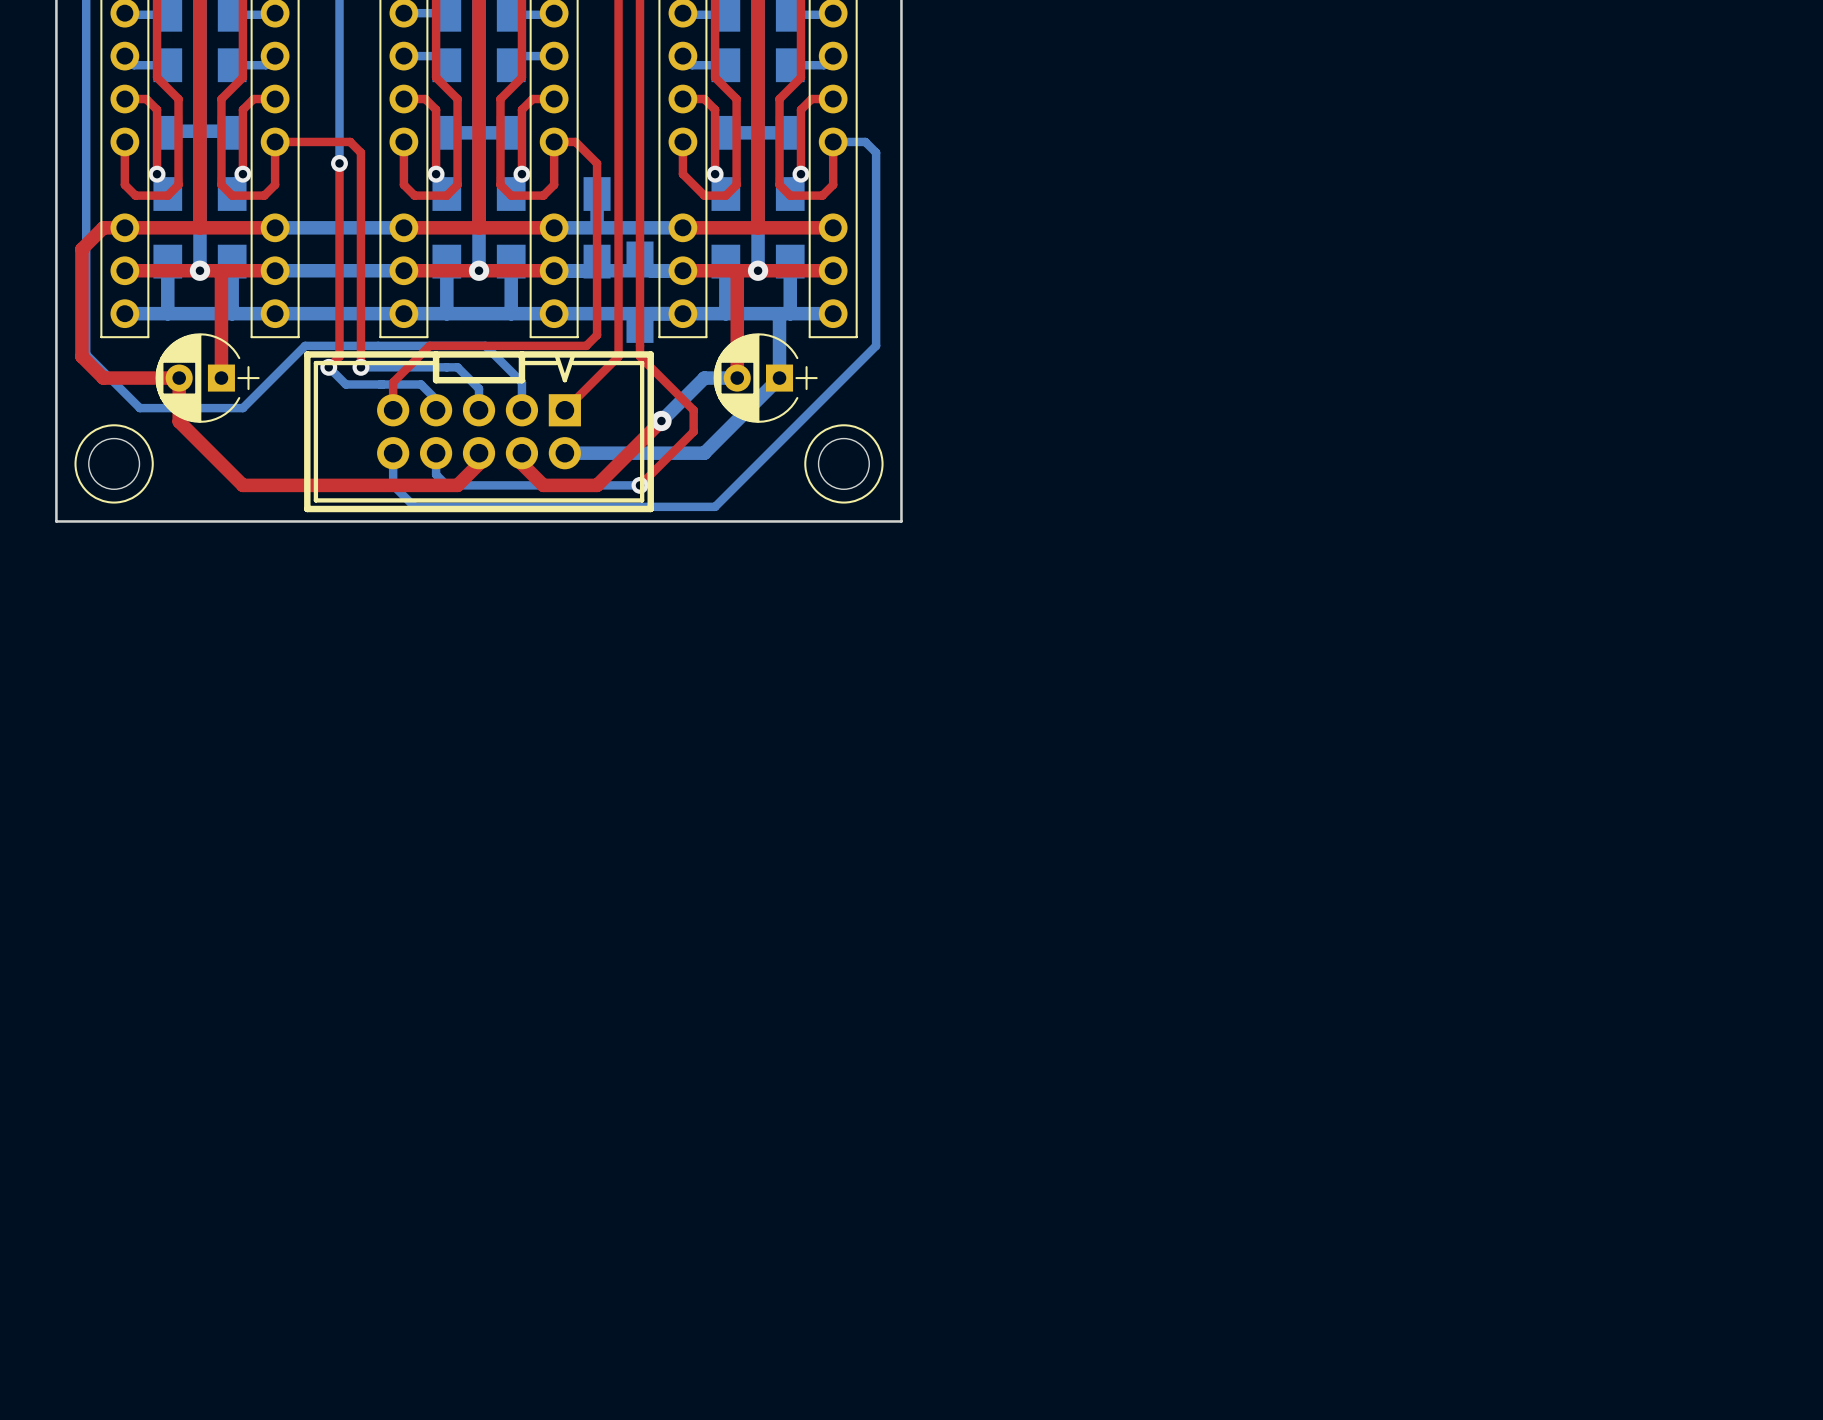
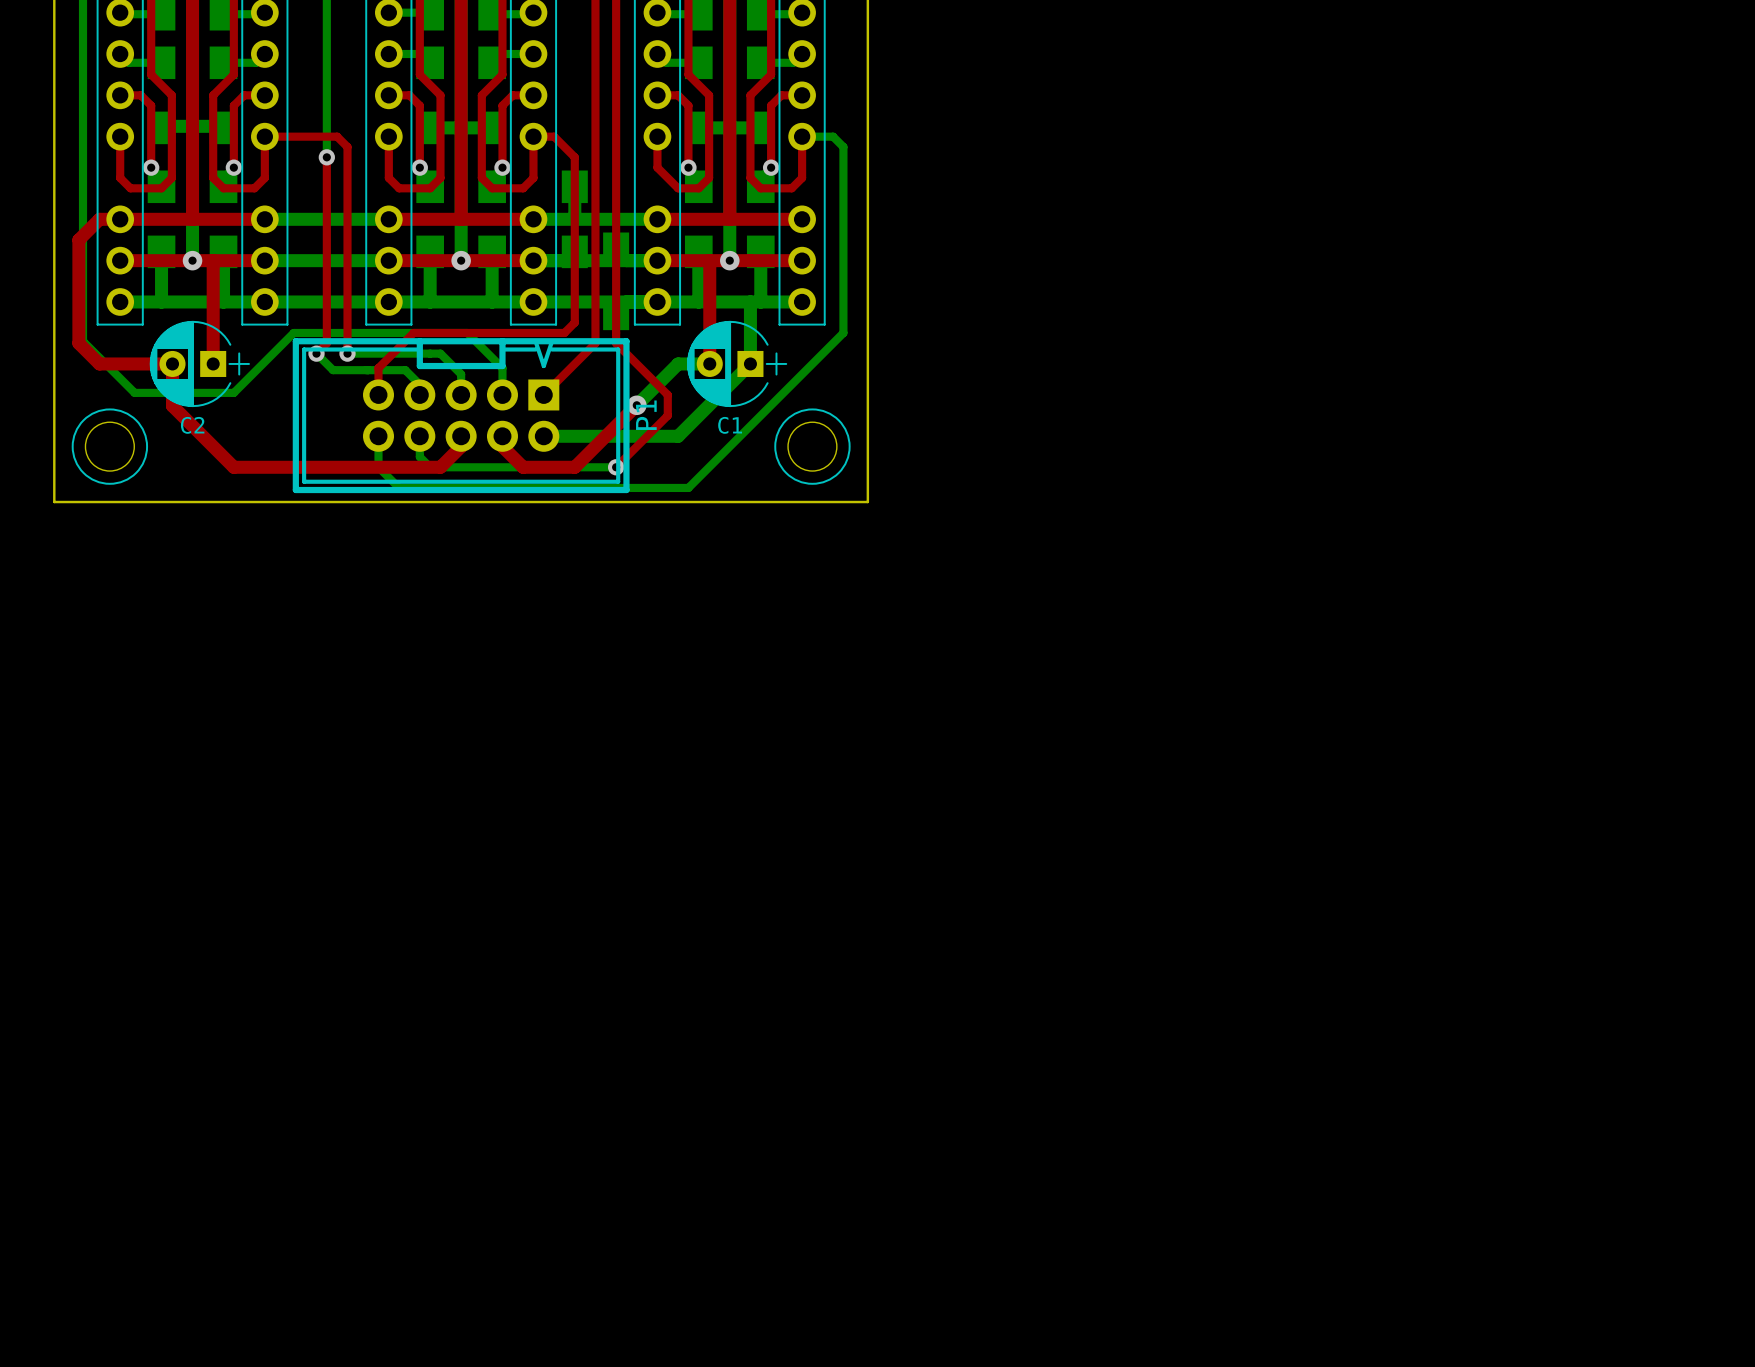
P1 name: none -> P1 (646, 415)
C2 name: none -> C2 (192, 425)
C1 name: none -> C1 (730, 425)

